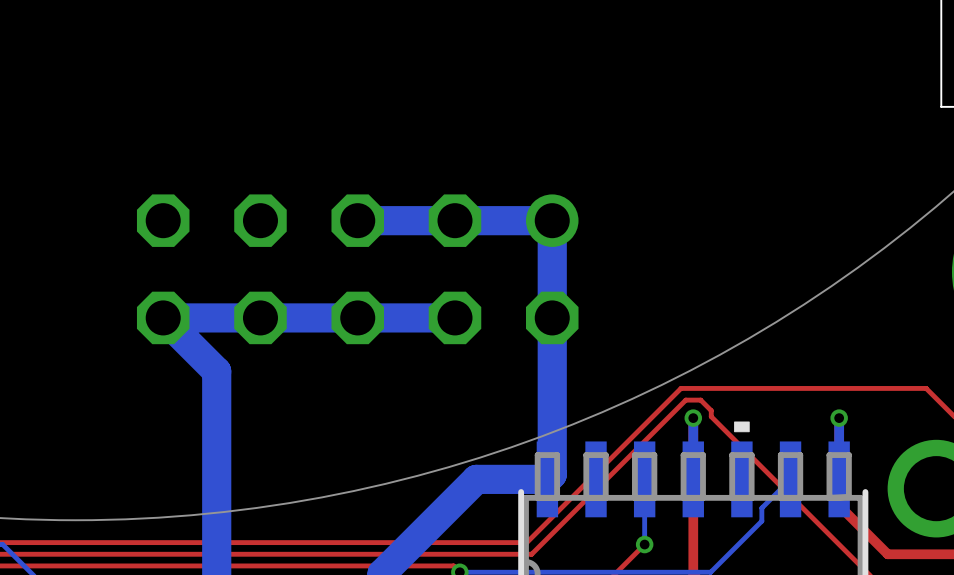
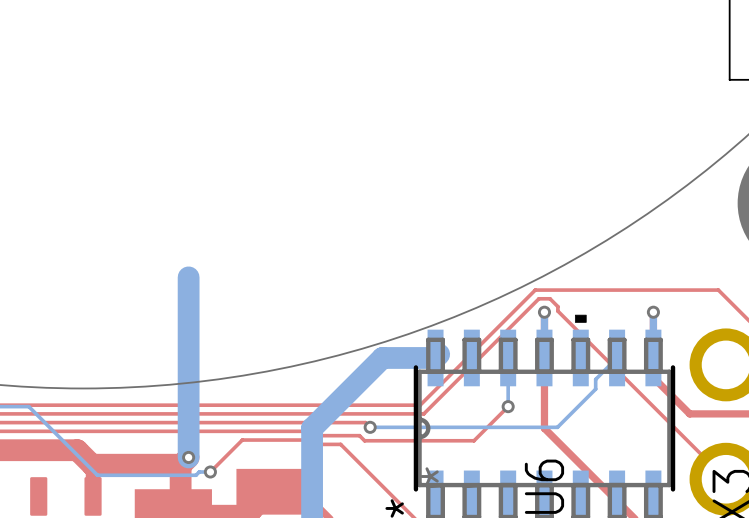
bottom track: (357, 220) (552, 220) (552, 474) -> none
part: (357, 269) -> none
bottom track: (454, 317) (163, 317) (216, 371) -> none

